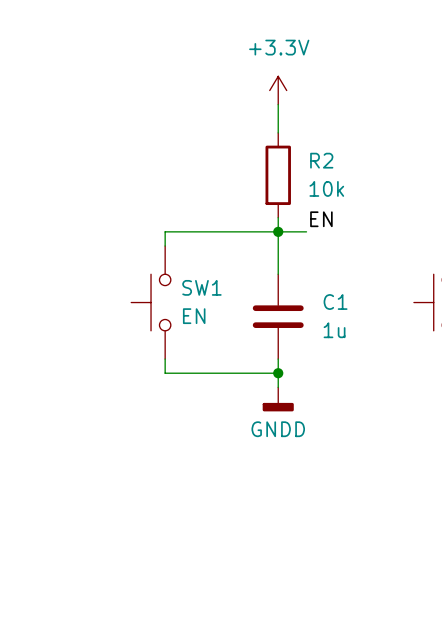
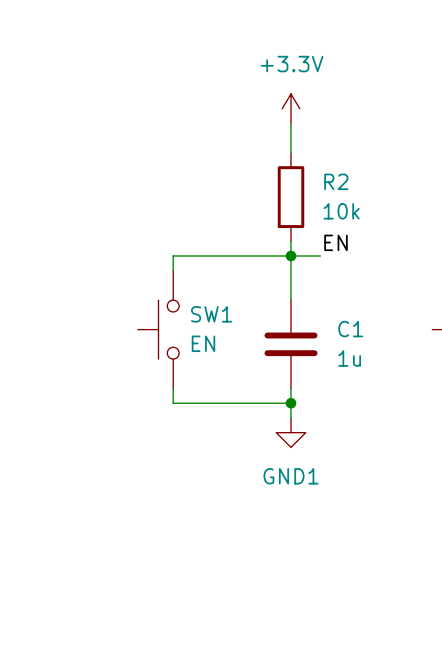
power symbol: GNDD (278, 399) -> GND1 (291, 432)

